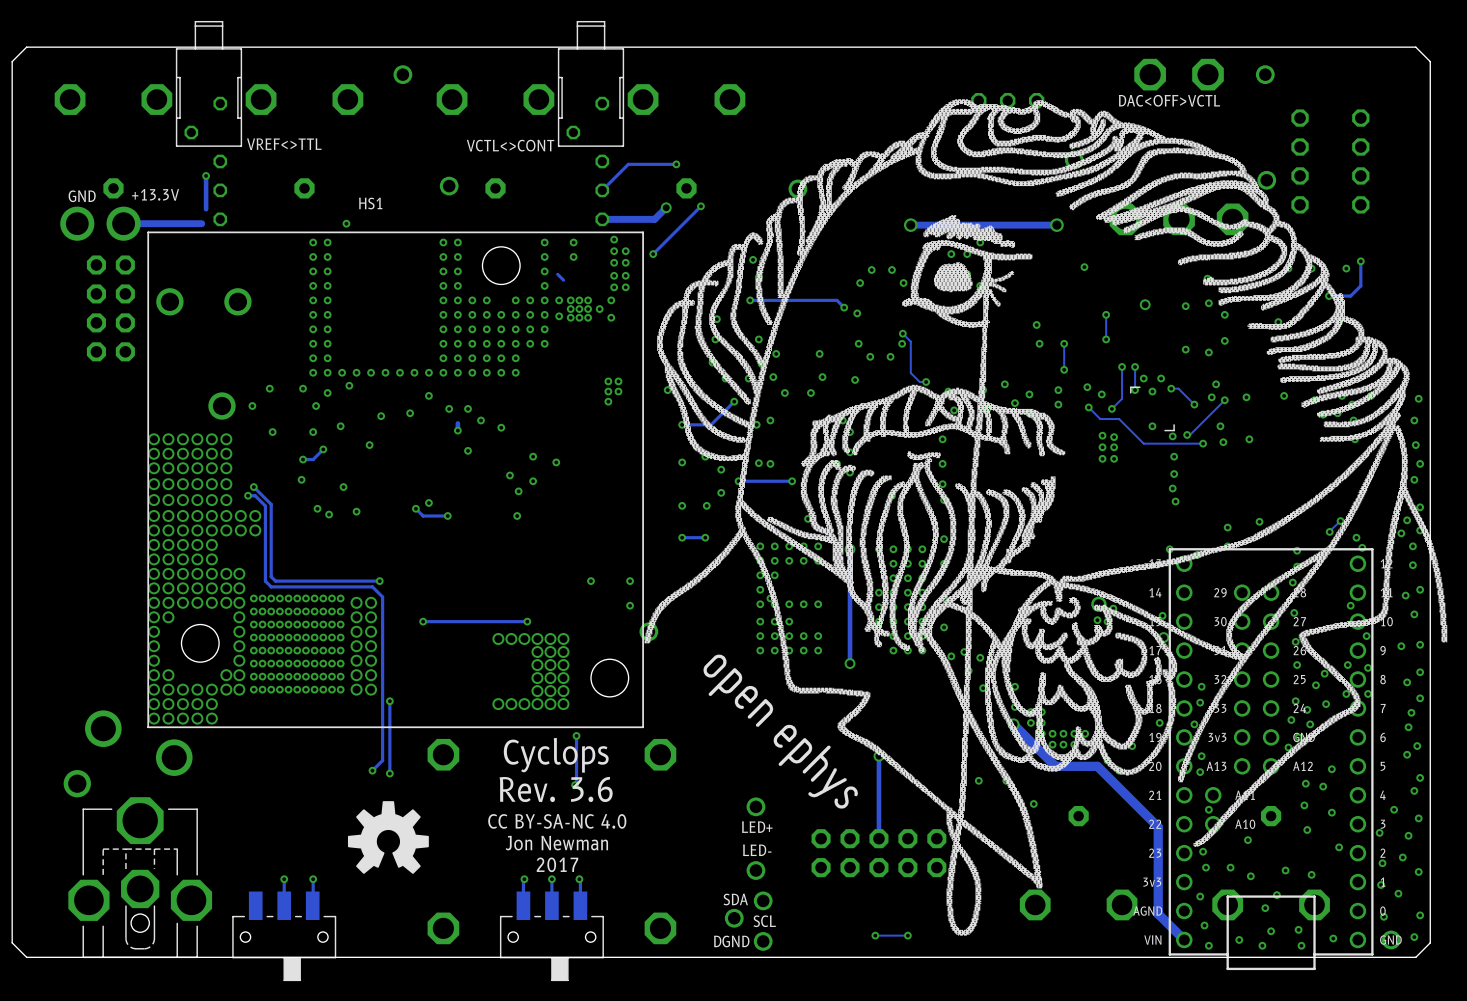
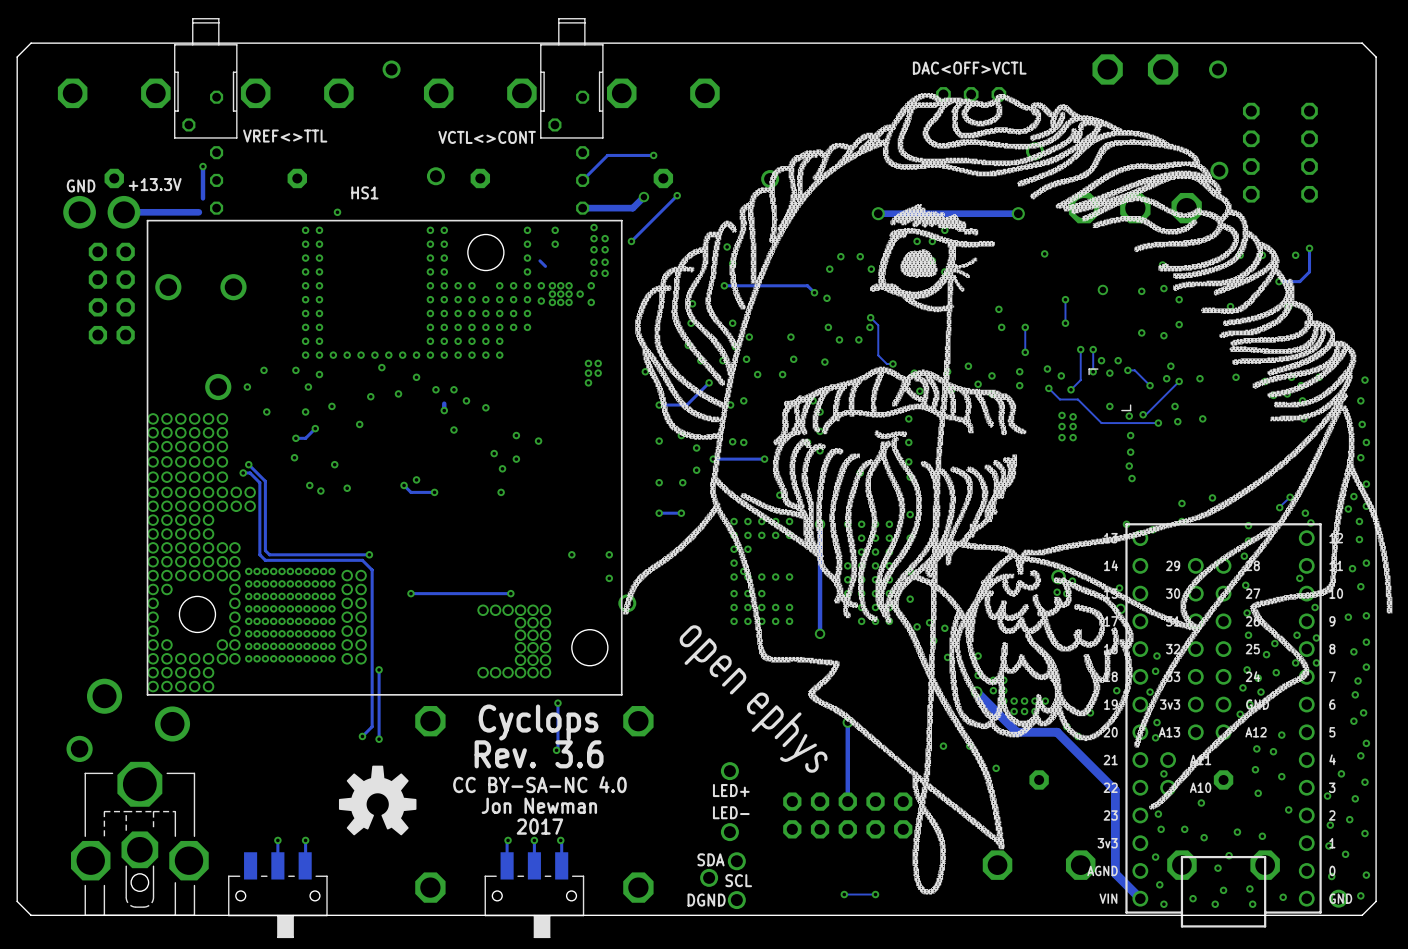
text position: DAC<OFF>VCTL (1169, 100) -> DAC<OFF>VCTL (969, 68)
via position: (349, 385) -> (381, 367)

